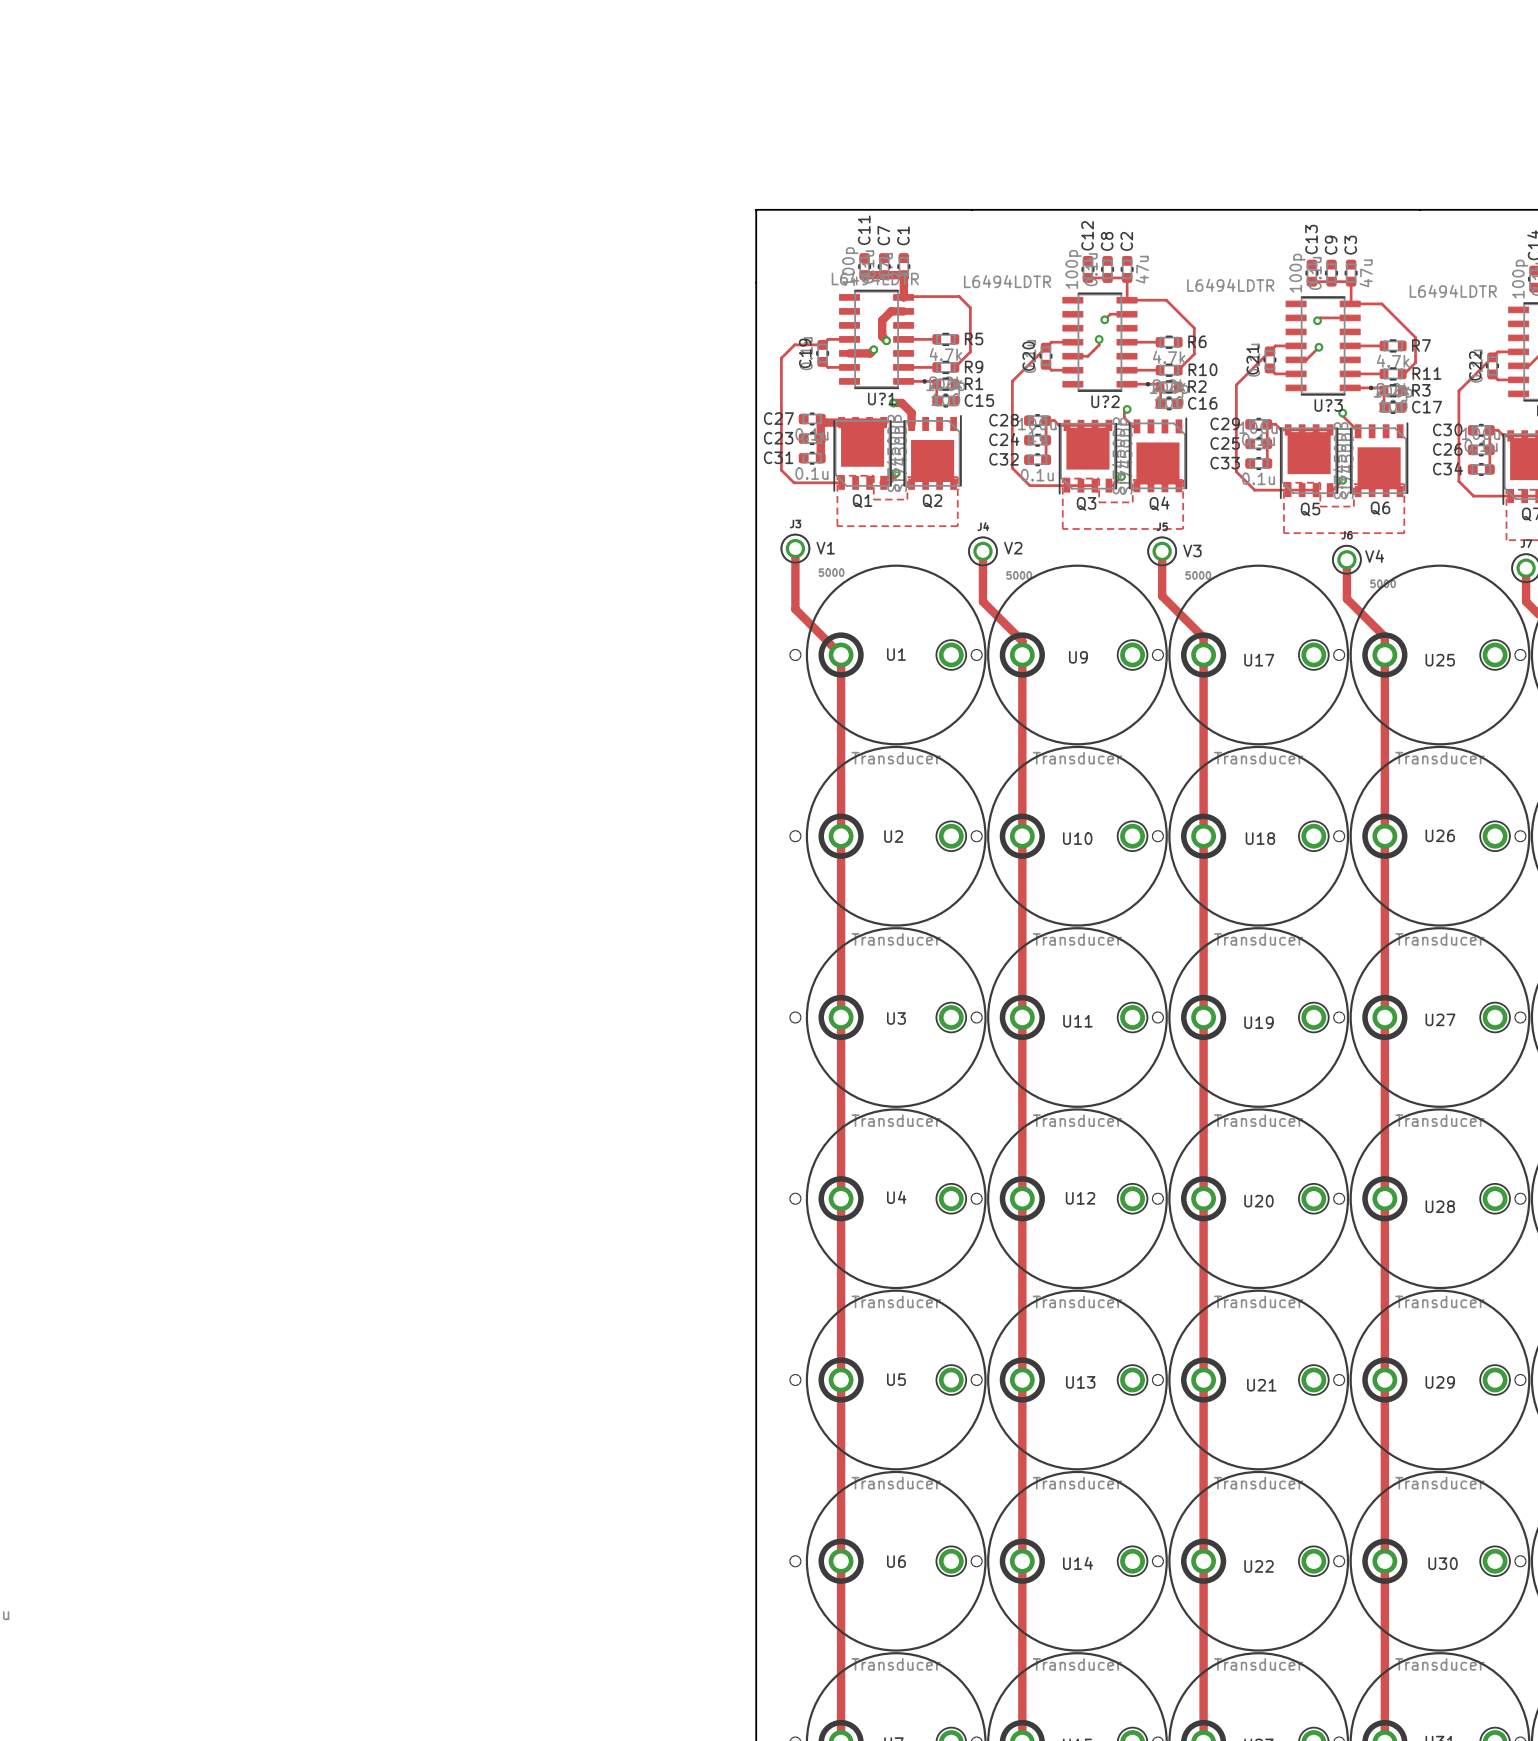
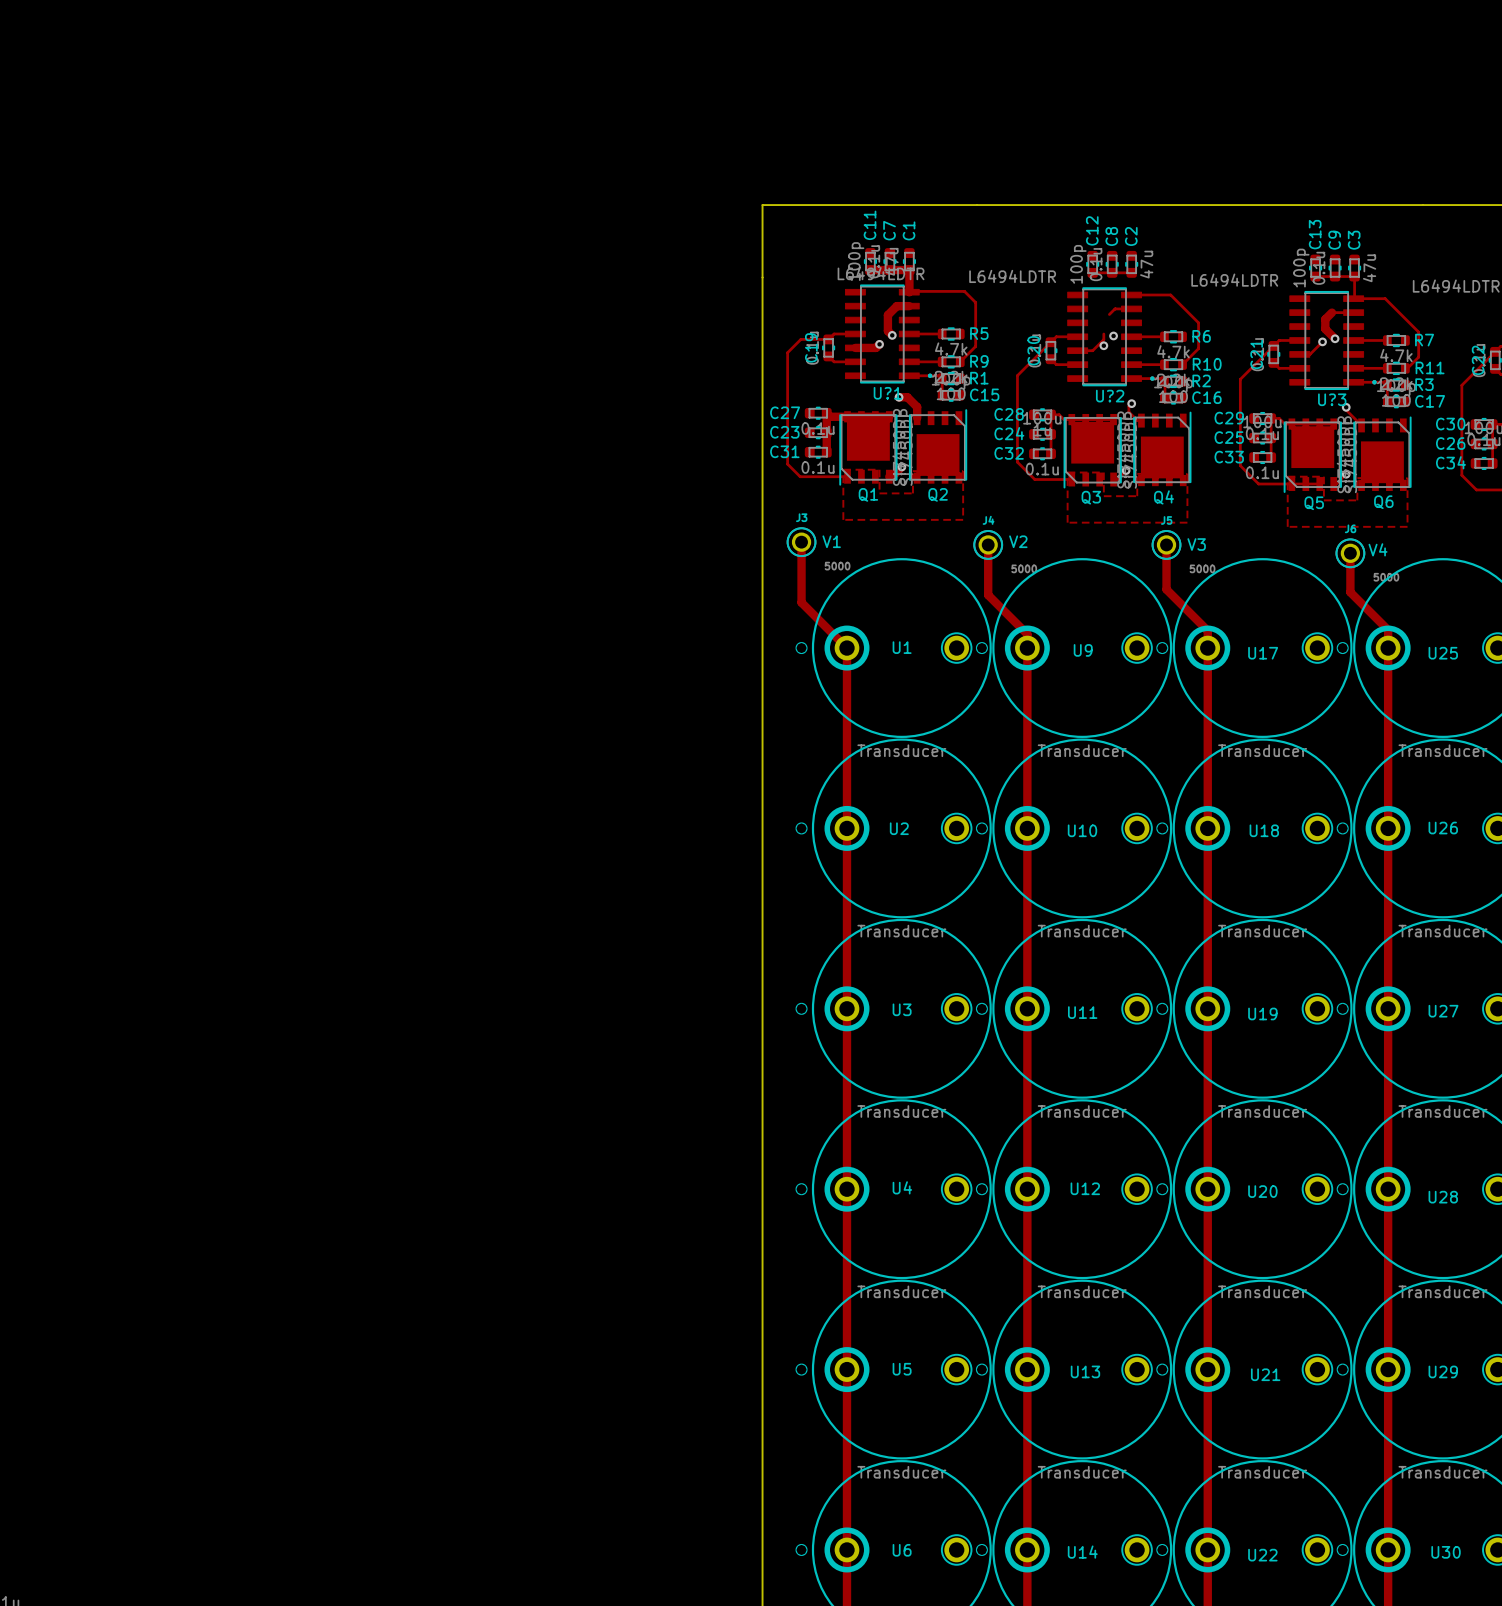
track: (1127, 277) (1127, 300) -> none
track: (1328, 317) (1320, 317) (1317, 320) -> (1331, 312) (1325, 319) (1325, 329) (1333, 337)
via: (1104, 319) -> none
via position: (1317, 320) -> (1335, 338)
via: (1099, 339) -> none
via: none -> (1113, 335)
via: none -> (1103, 345)
track: (1066, 485) (1094, 485) -> none

